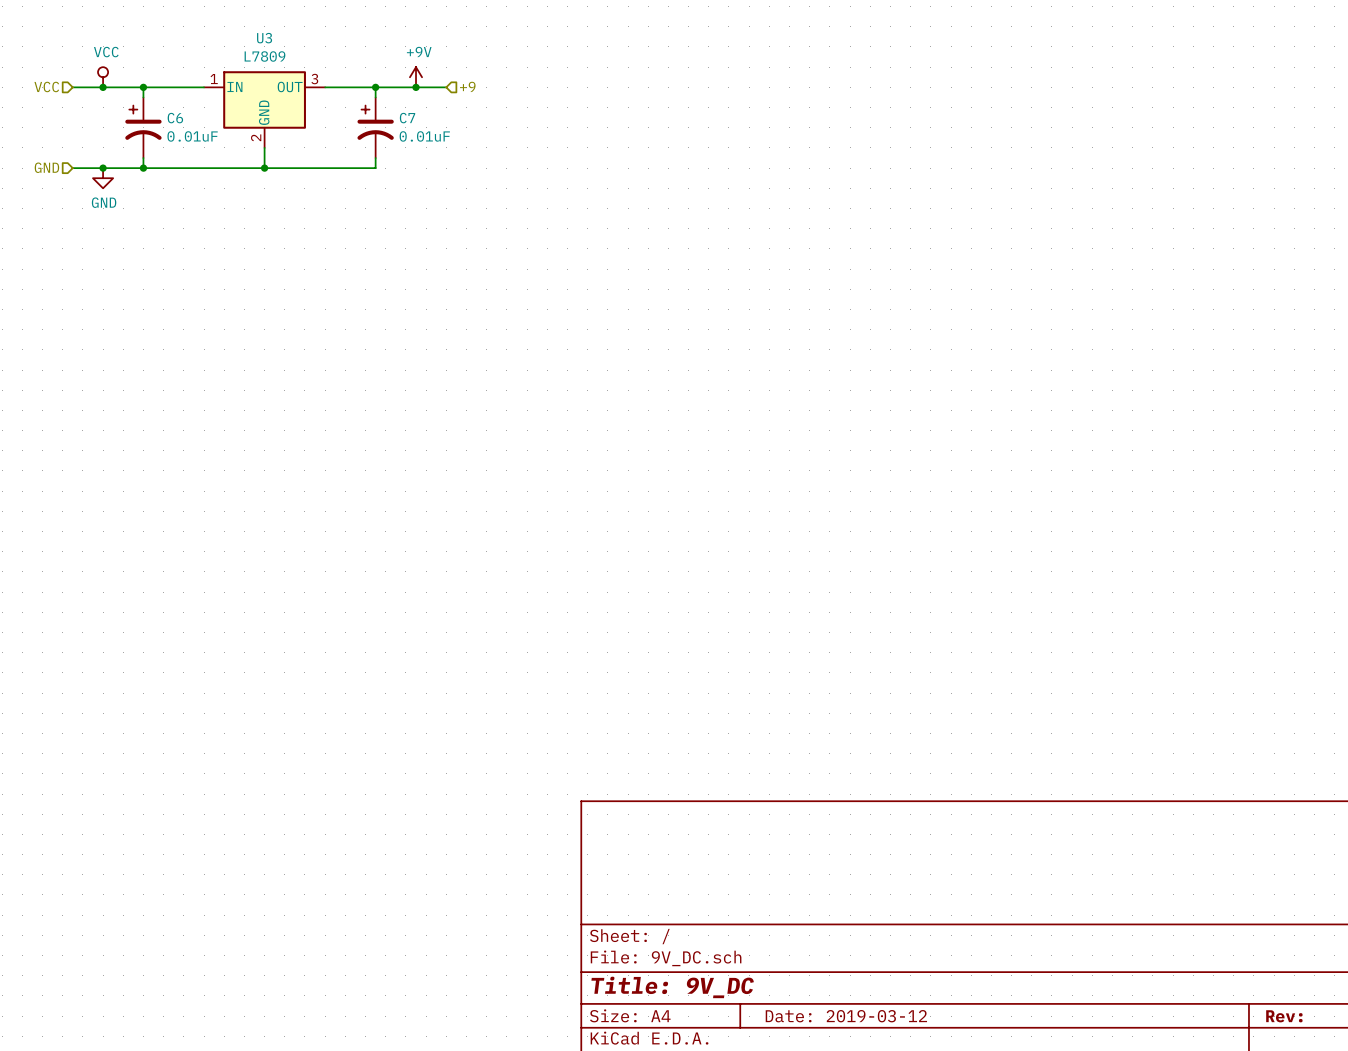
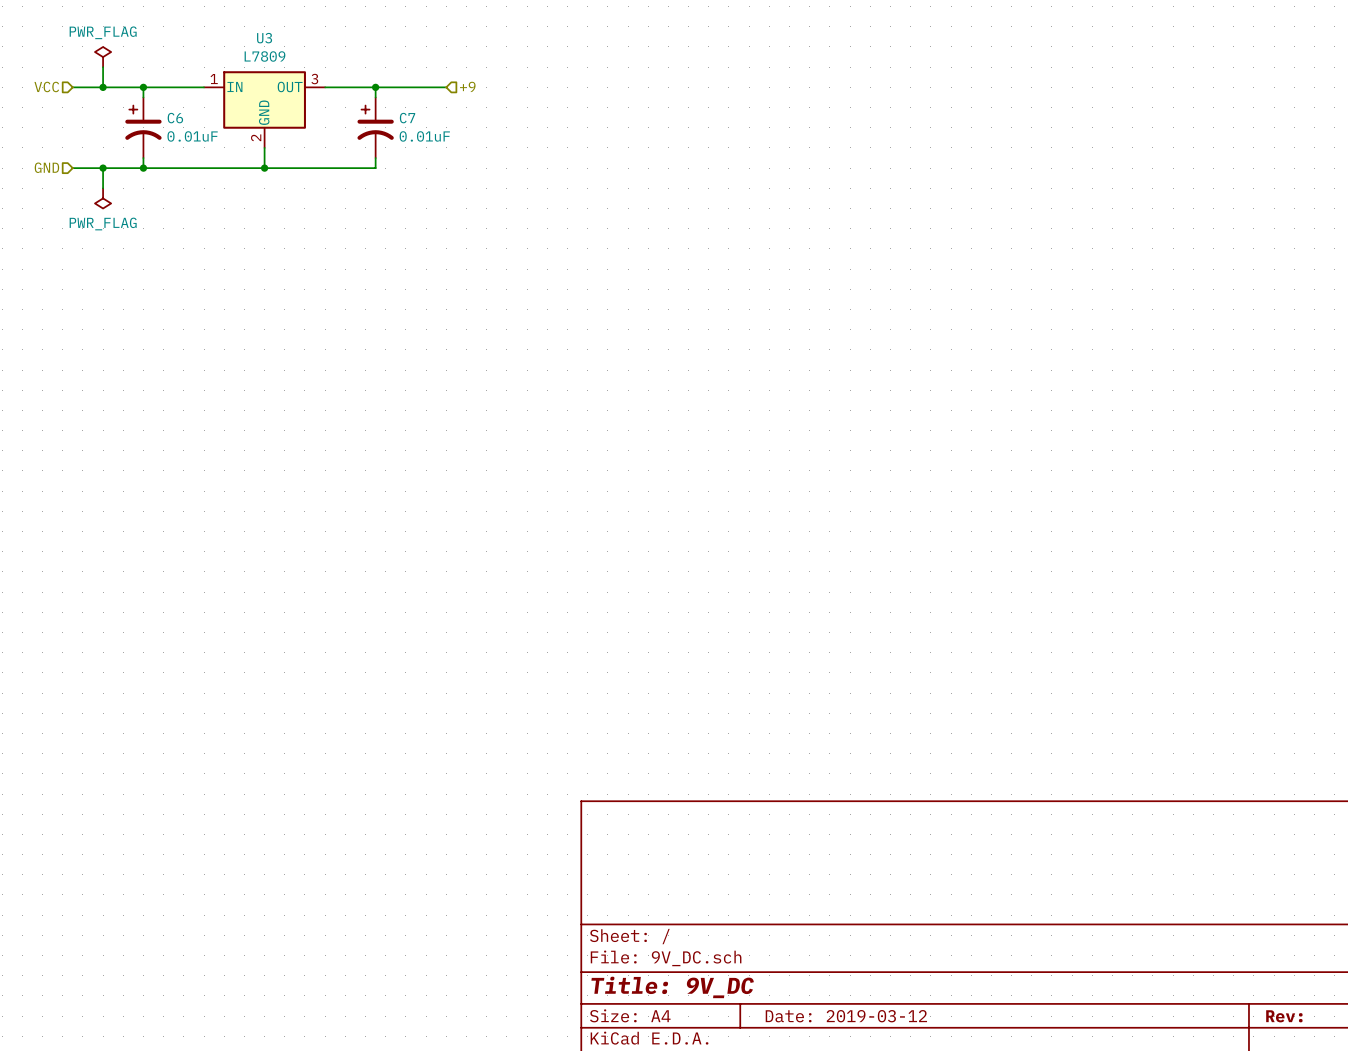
power symbol: none -> PWR_FLAG (103, 57)
power symbol: VCC (103, 77) -> none
power symbol: +9V (416, 77) -> none
junction: (416, 87) -> none
power symbol: GND (103, 178) -> none
power symbol: none -> PWR_FLAG (103, 198)

